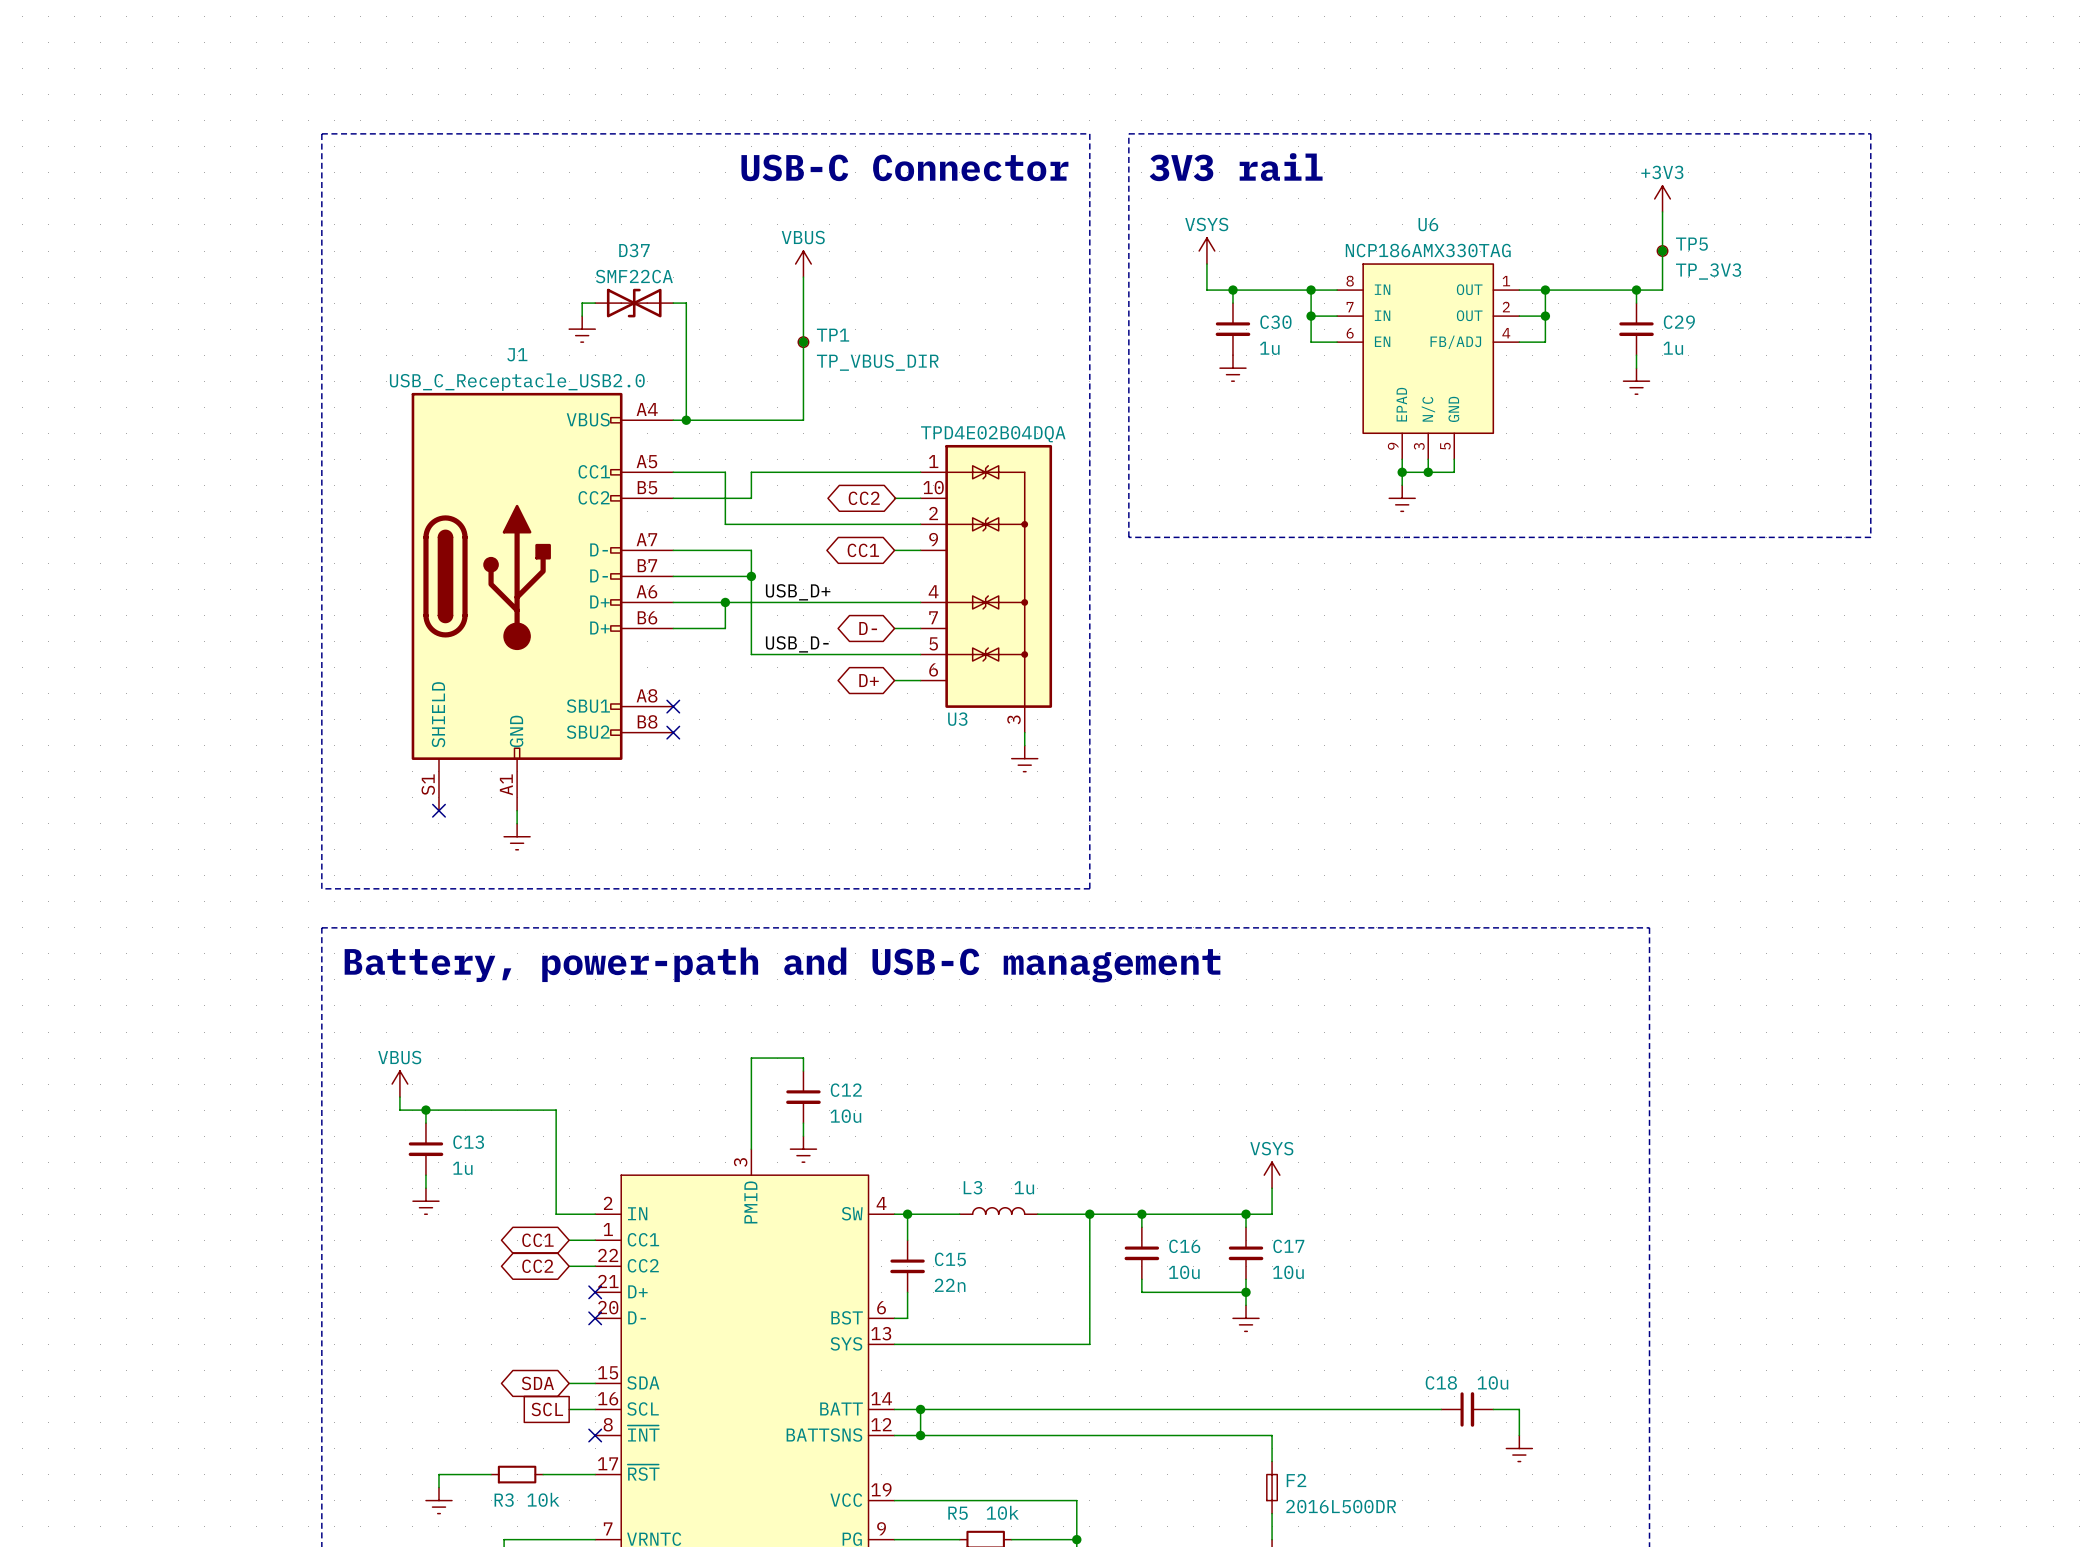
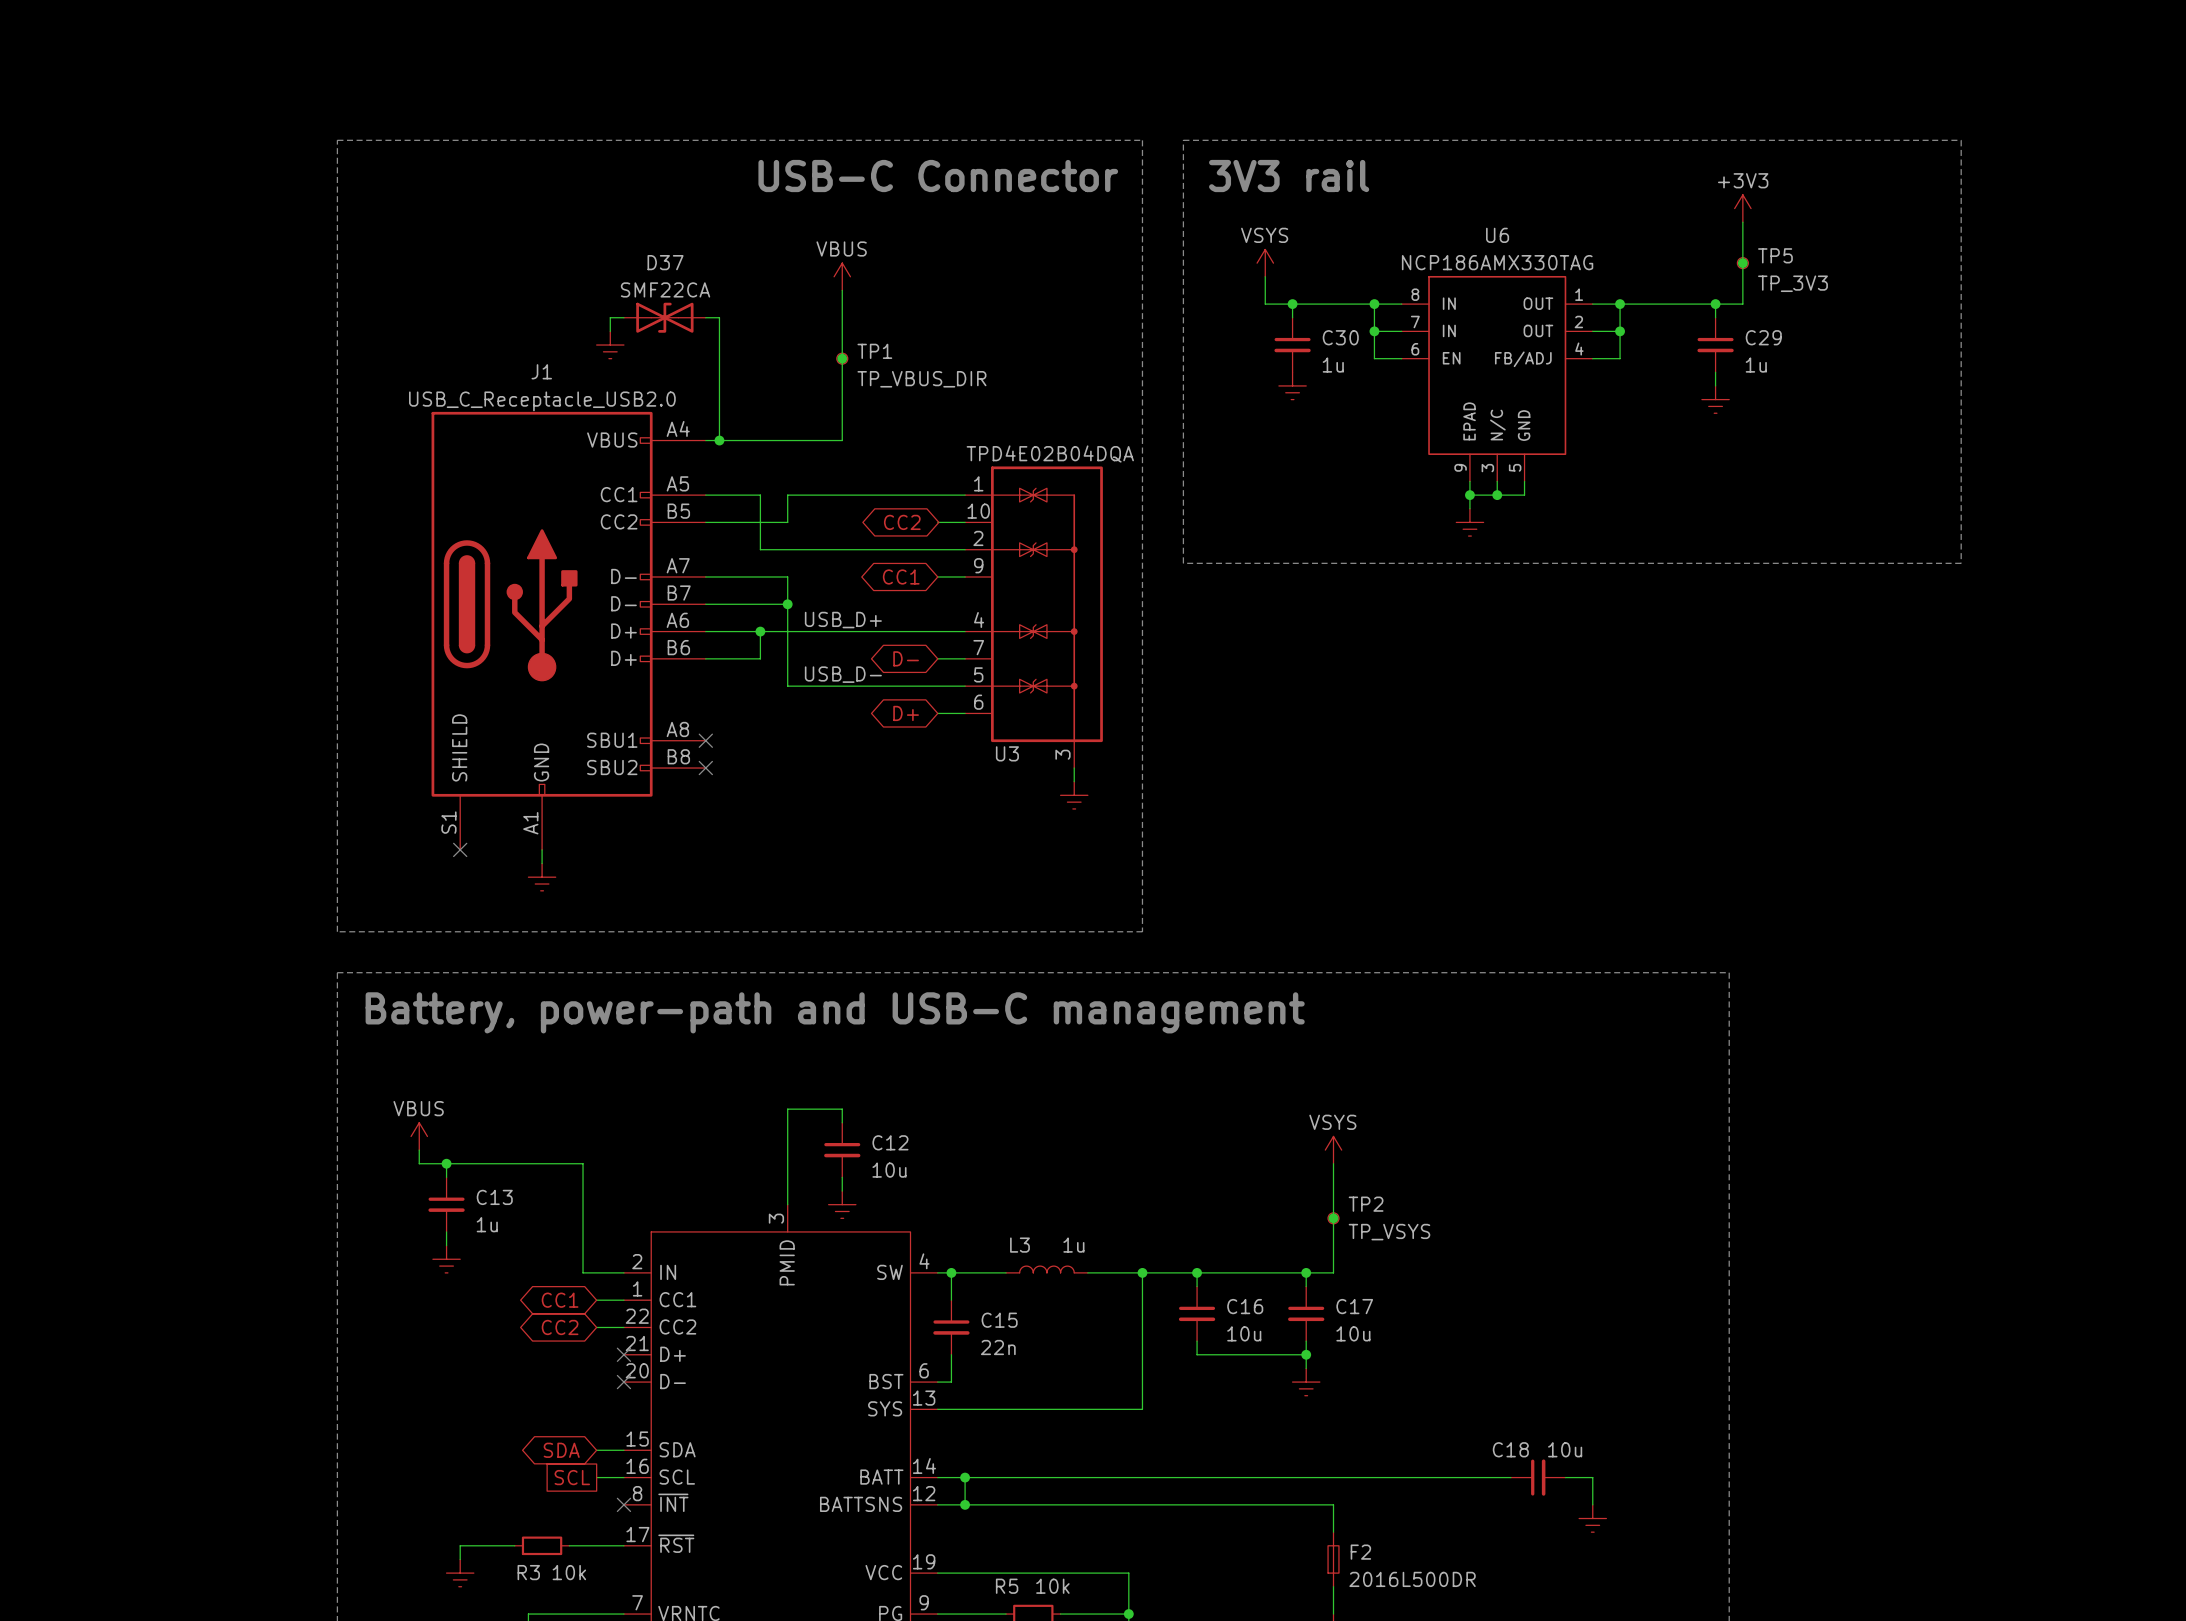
wire: none -> (1333, 1163) (1333, 1245)
junction: none -> (1333, 1218)
TP2: none -> TP_VSYS (1333, 1218)
power symbol position: VSYS (1272, 1175) -> VSYS (1333, 1150)

